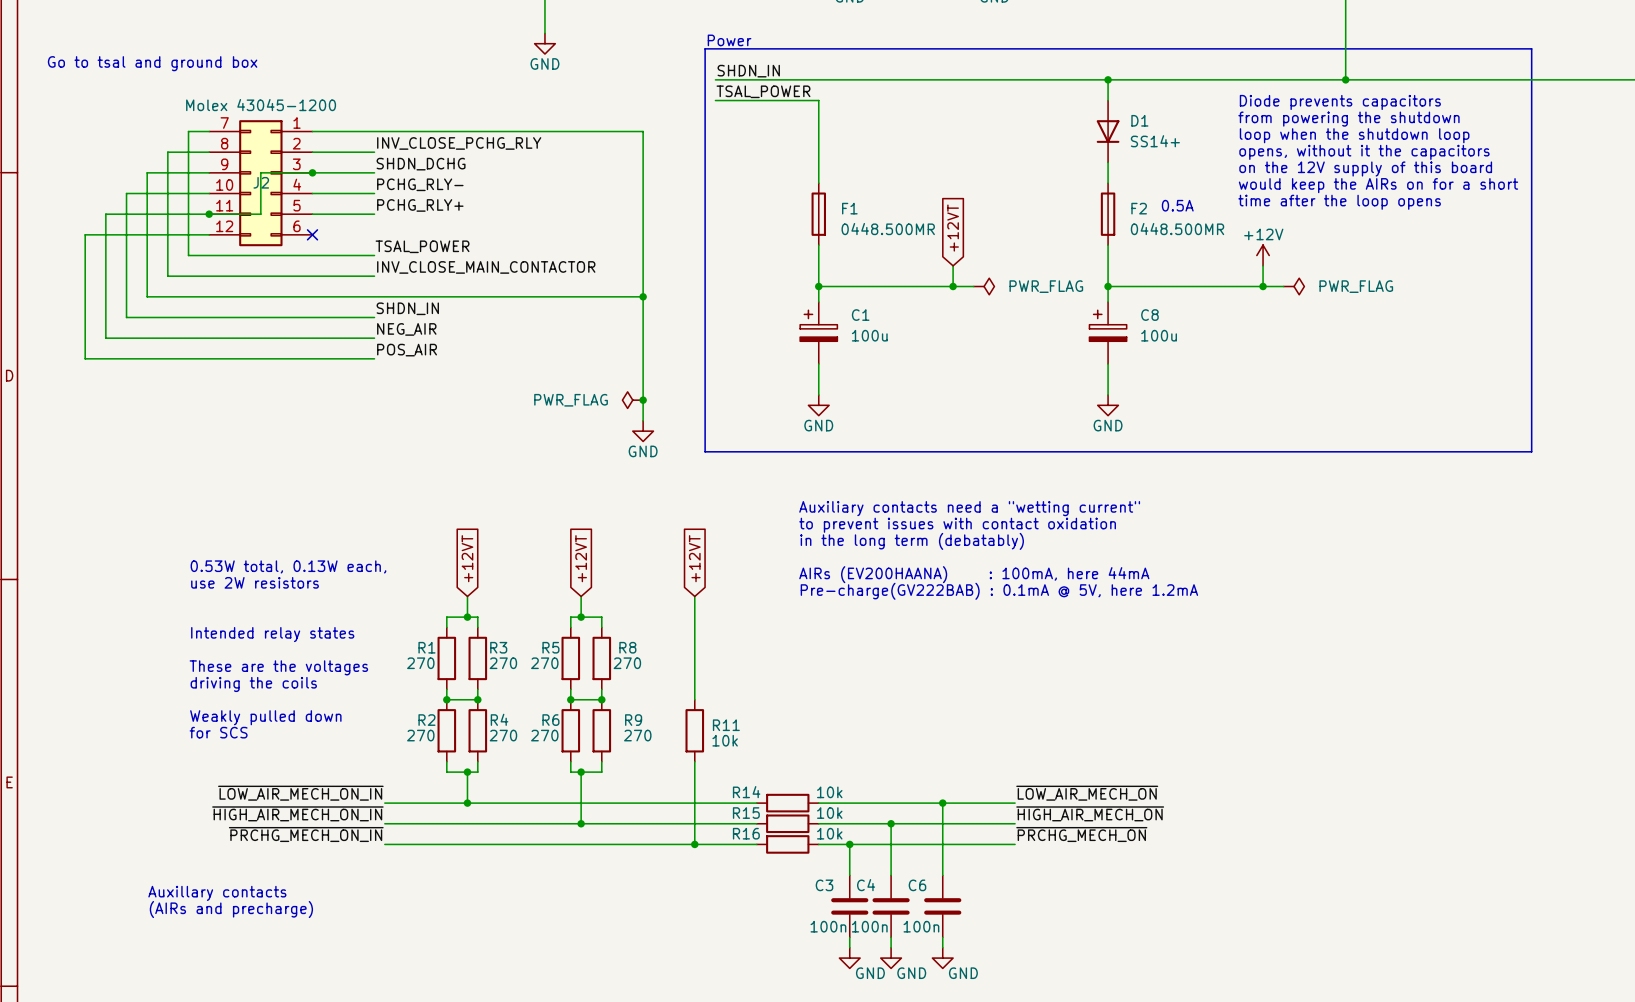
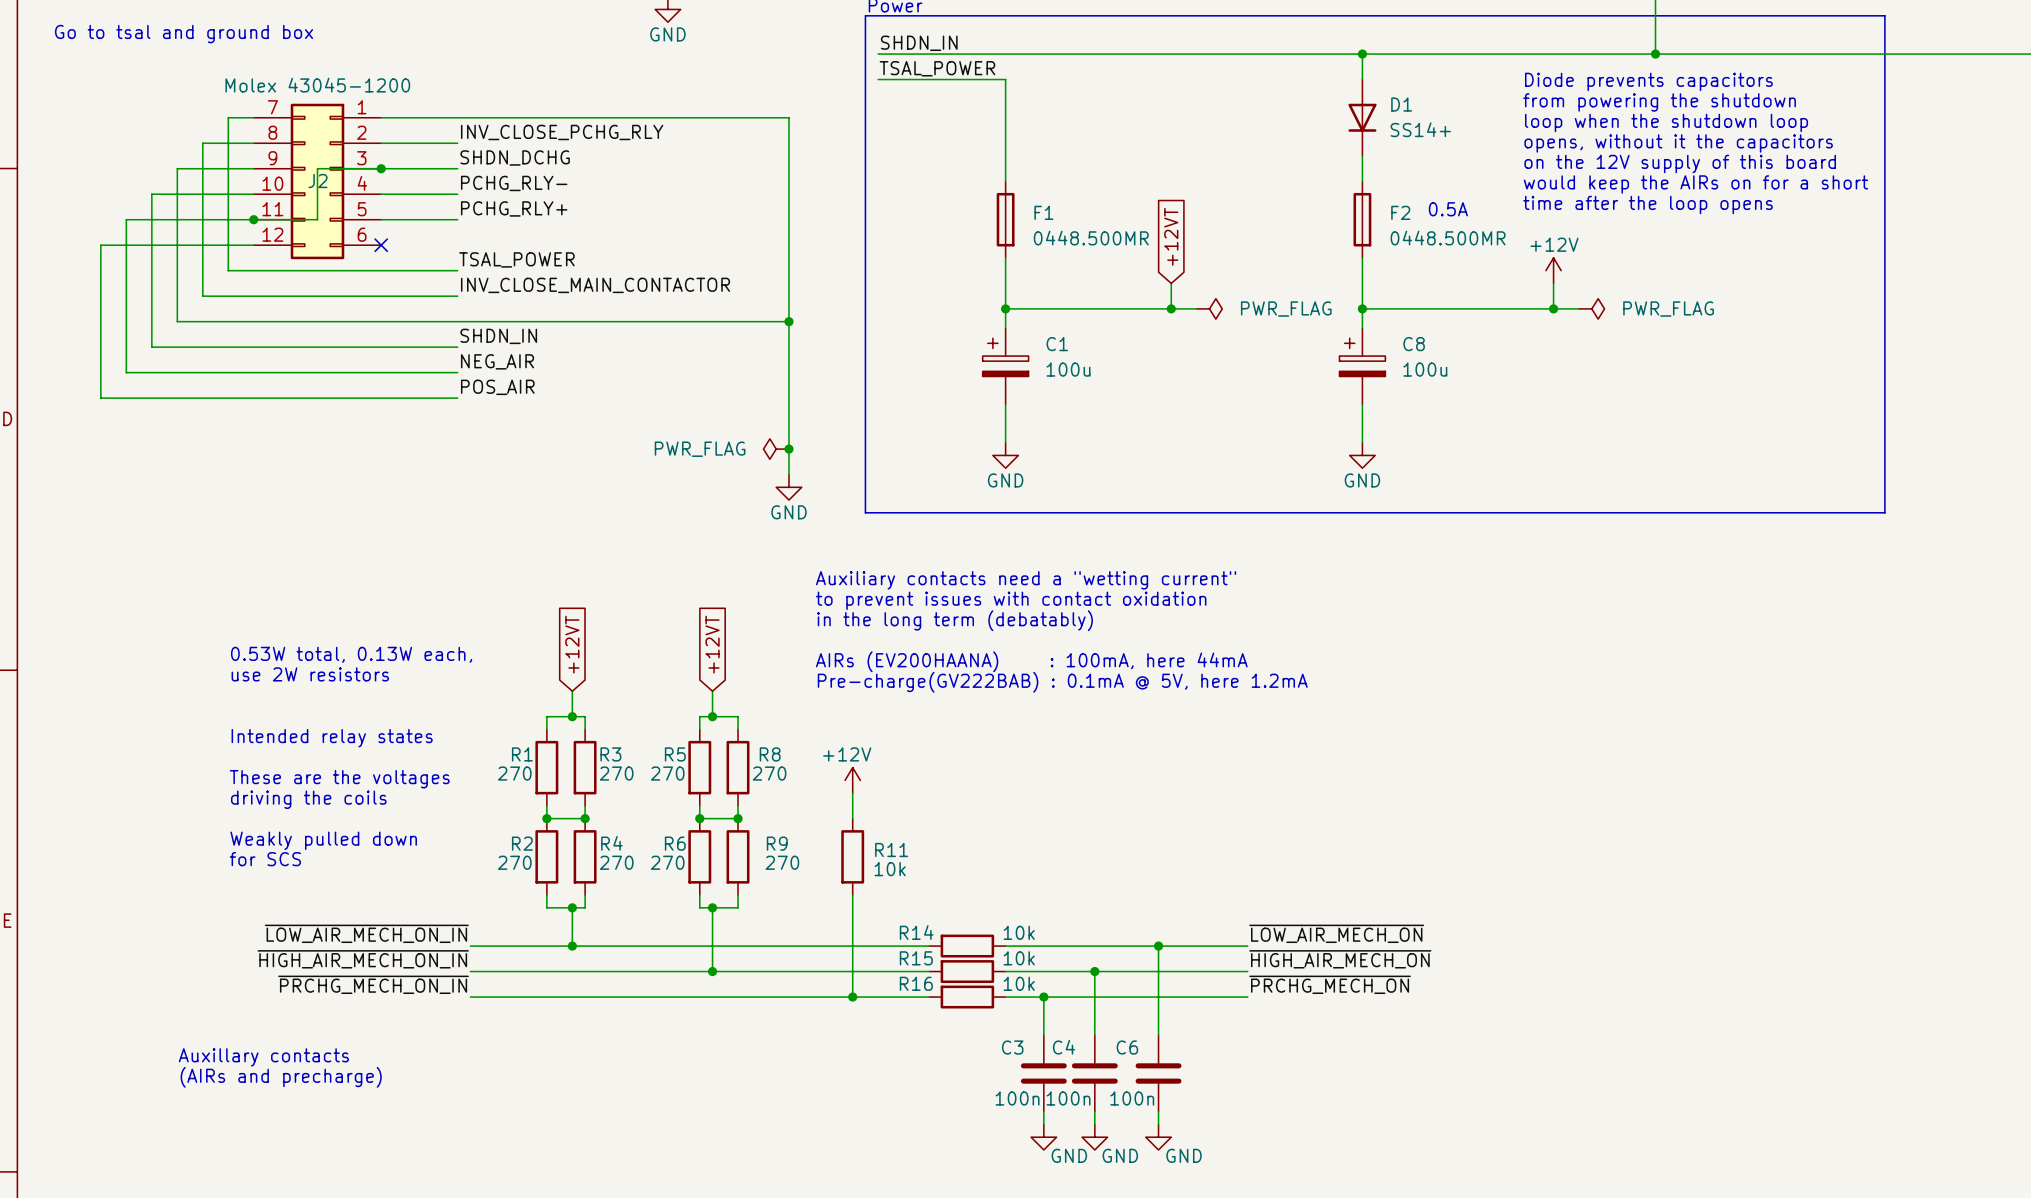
text position: Auxiliary contacts need a "wetting current" (969, 508) -> Auxiliary contacts need a "wetting current" (1026, 580)
text position: to prevent issues with contact oxidation (957, 525) -> to prevent issues with contact oxidation (1011, 600)
text position: in the long term (debatably) (912, 541) -> in the long term (debatably) (955, 620)
global label: +12VT (694, 558) -> none
text position: AIRs (EV200HAANA) : 100mA, here 44mA (974, 574) -> AIRs (EV200HAANA) : 100mA, here 44mA (1031, 661)
text position: Pre-charge(GV222BAB) : 0.1mA @ 5V, here 1.2mA (999, 591) -> Pre-charge(GV222BAB) : 0.1mA @ 5V, here 1.2mA (1062, 682)
wire: (694, 596) (694, 679) -> none
power symbol: none -> +12V (852, 780)

